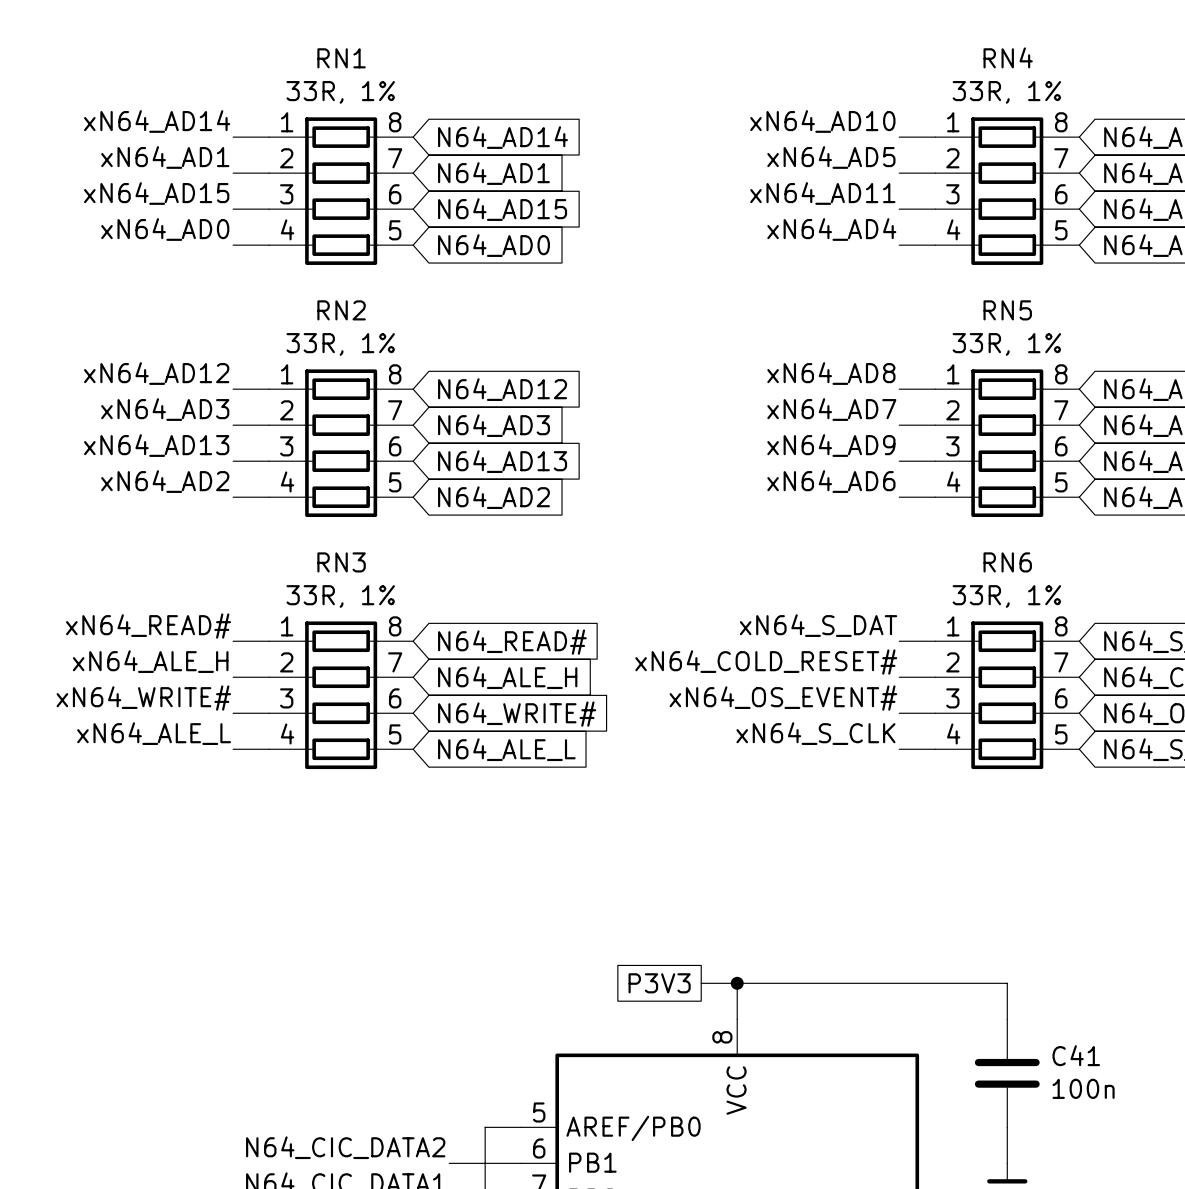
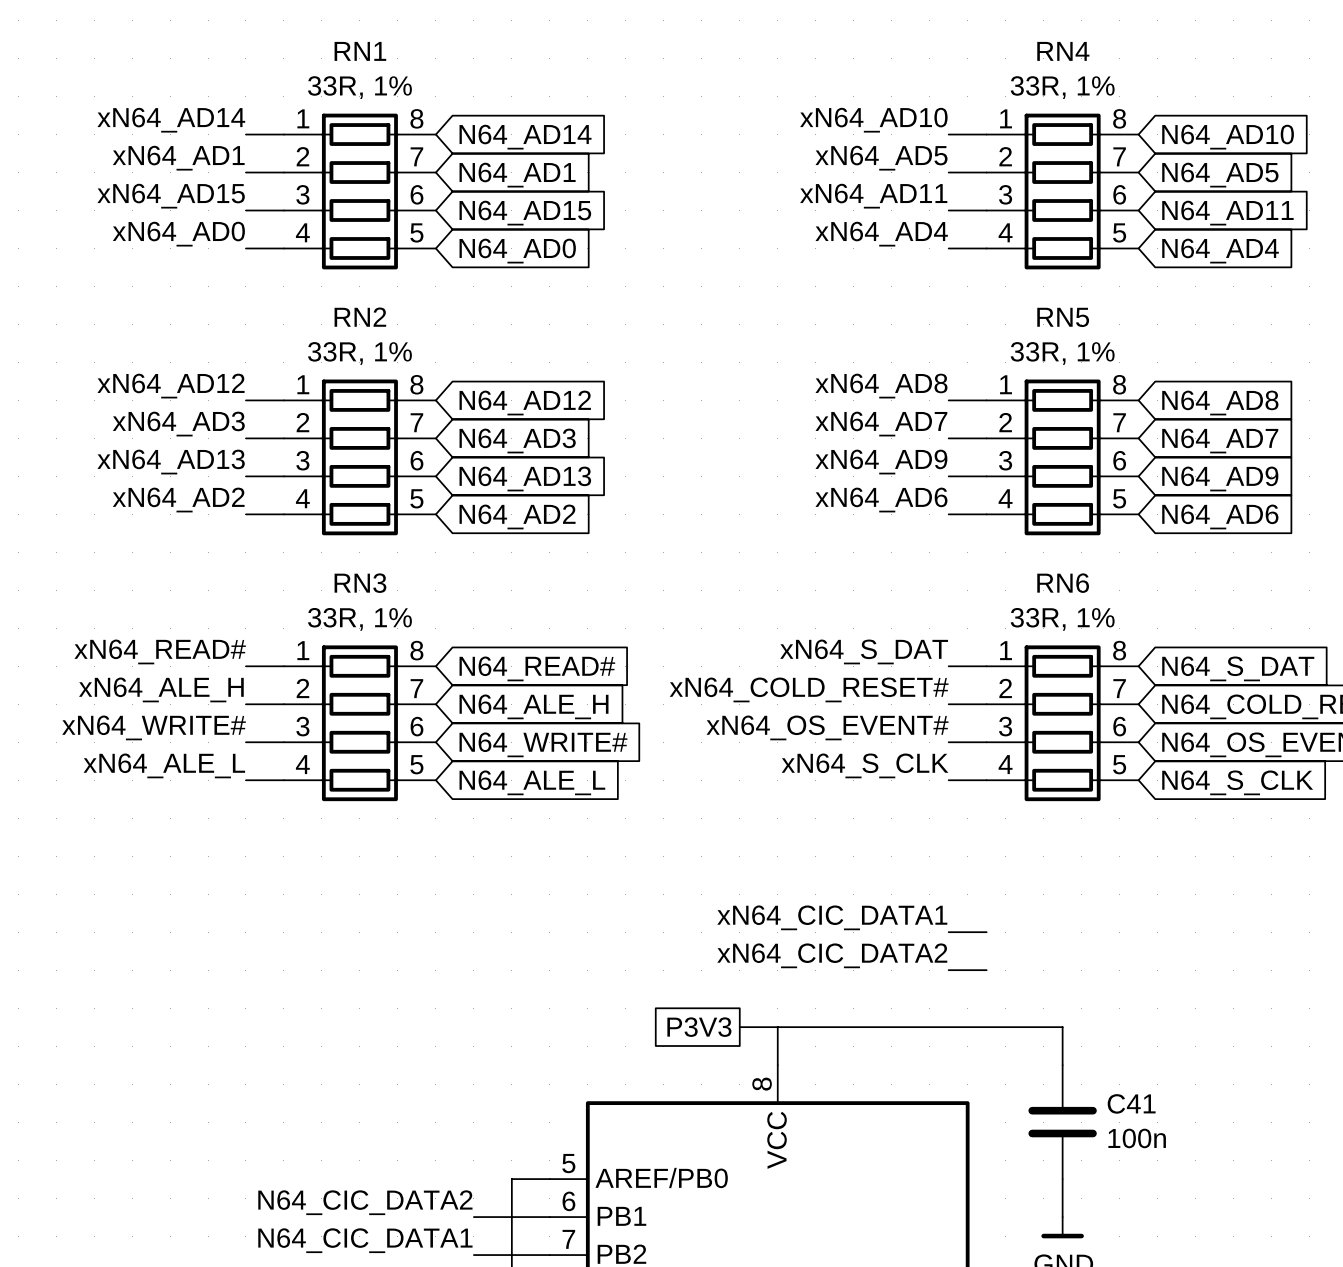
label: none -> xN64_CIC_DATA1 (832, 917)
wire: none -> (948, 932) (986, 932)
label: none -> xN64_CIC_DATA2 (832, 955)
wire: none -> (948, 970) (986, 970)
junction: (737, 983) -> none

